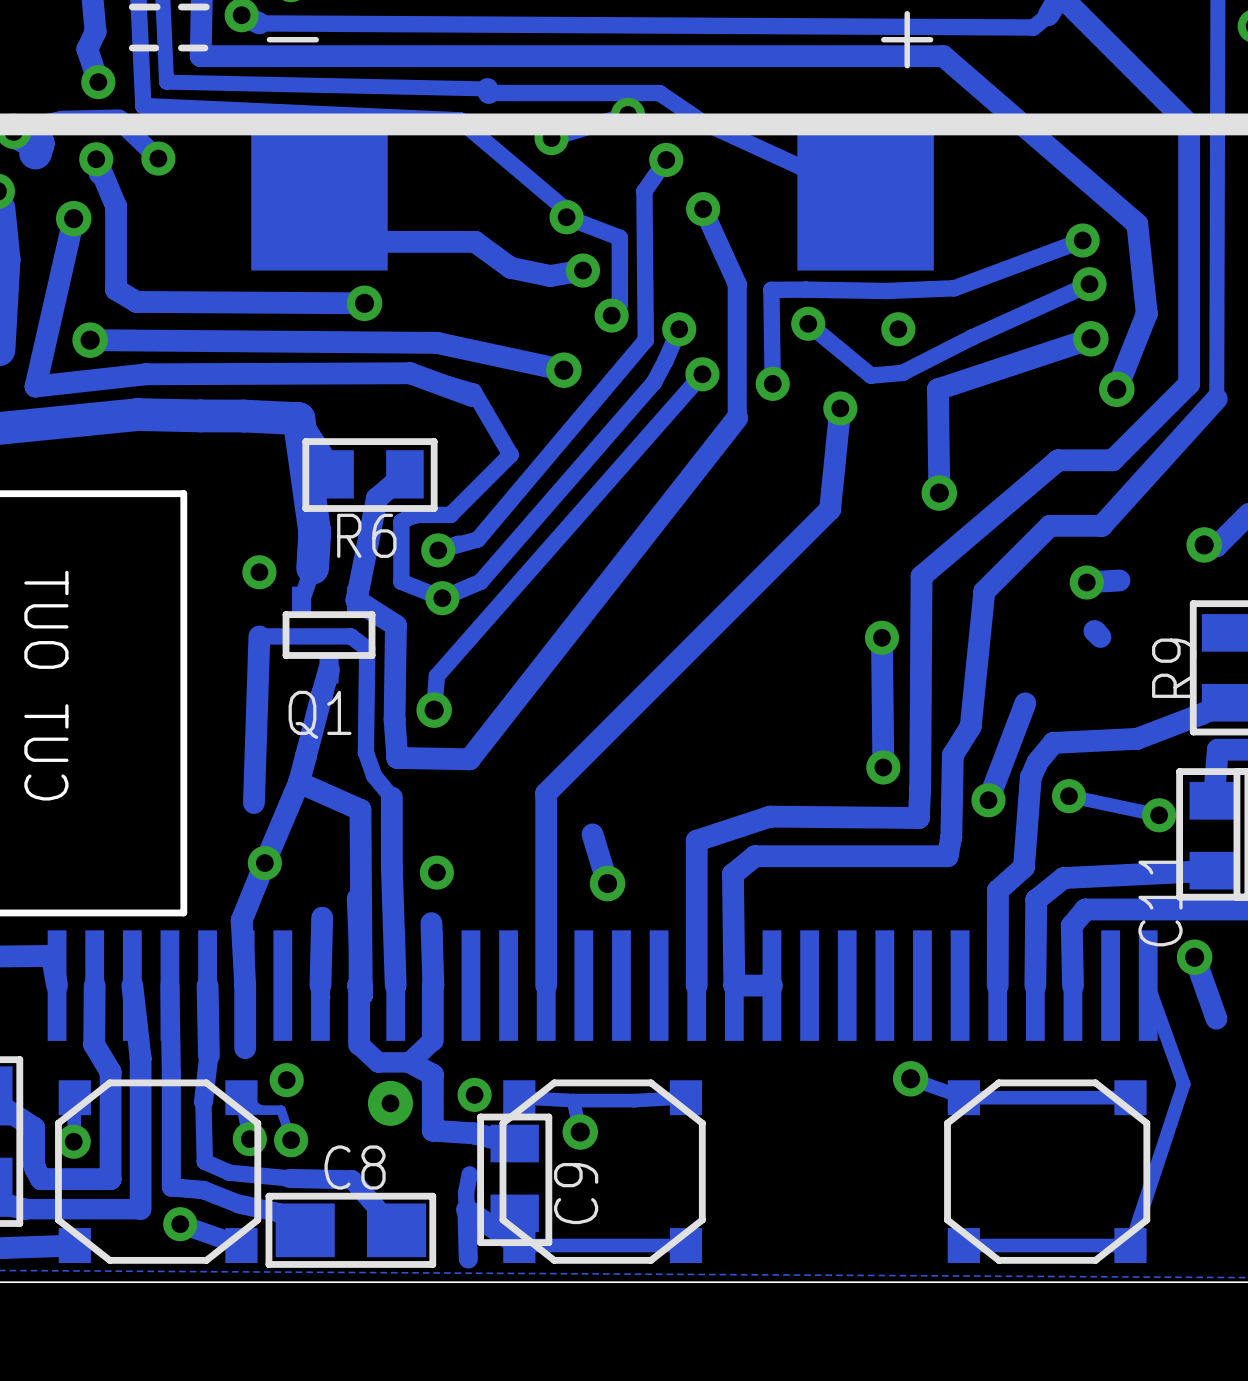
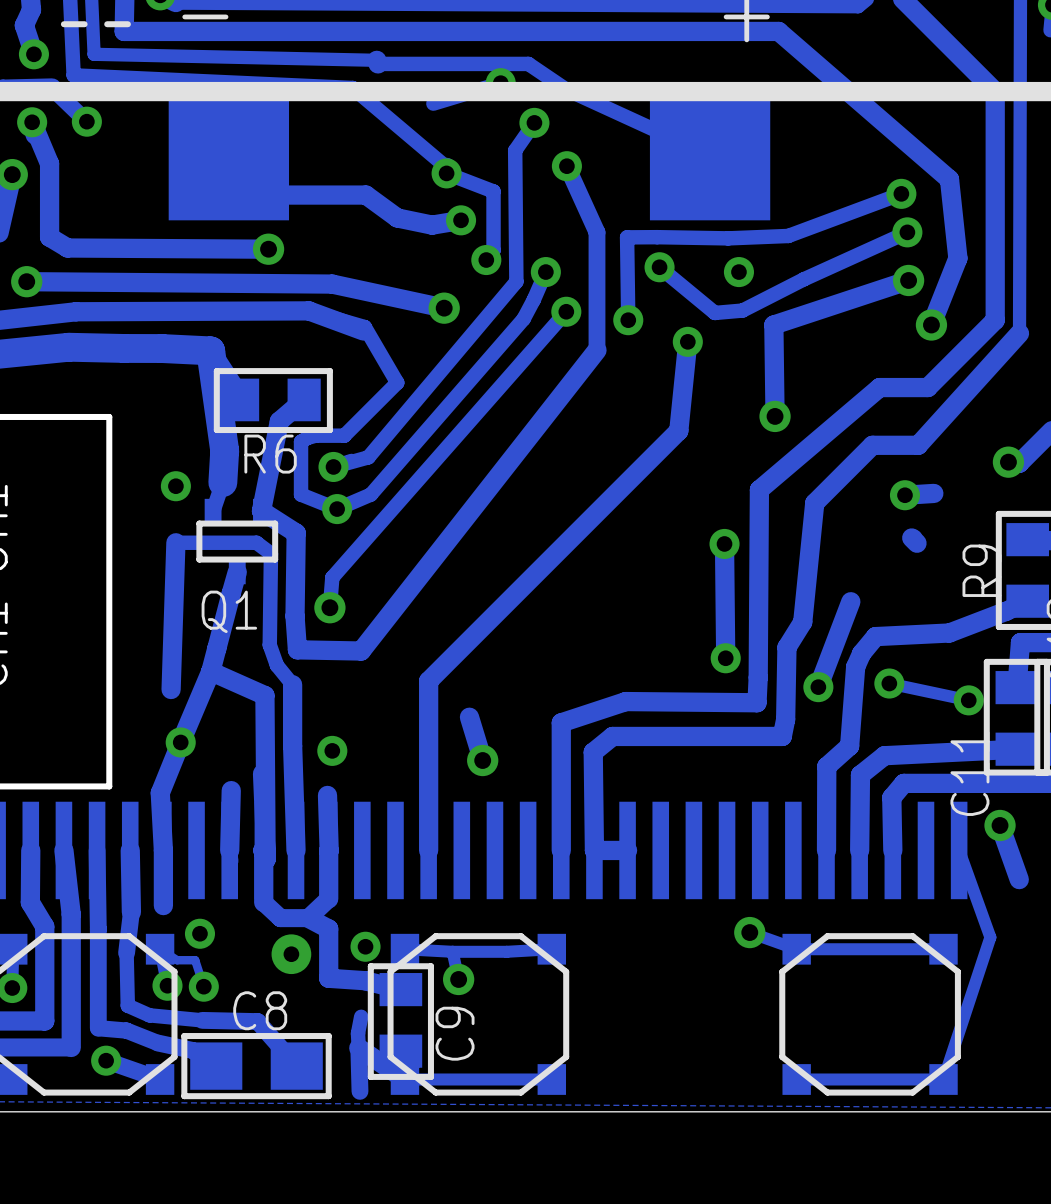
via: (551, 138) -> none

